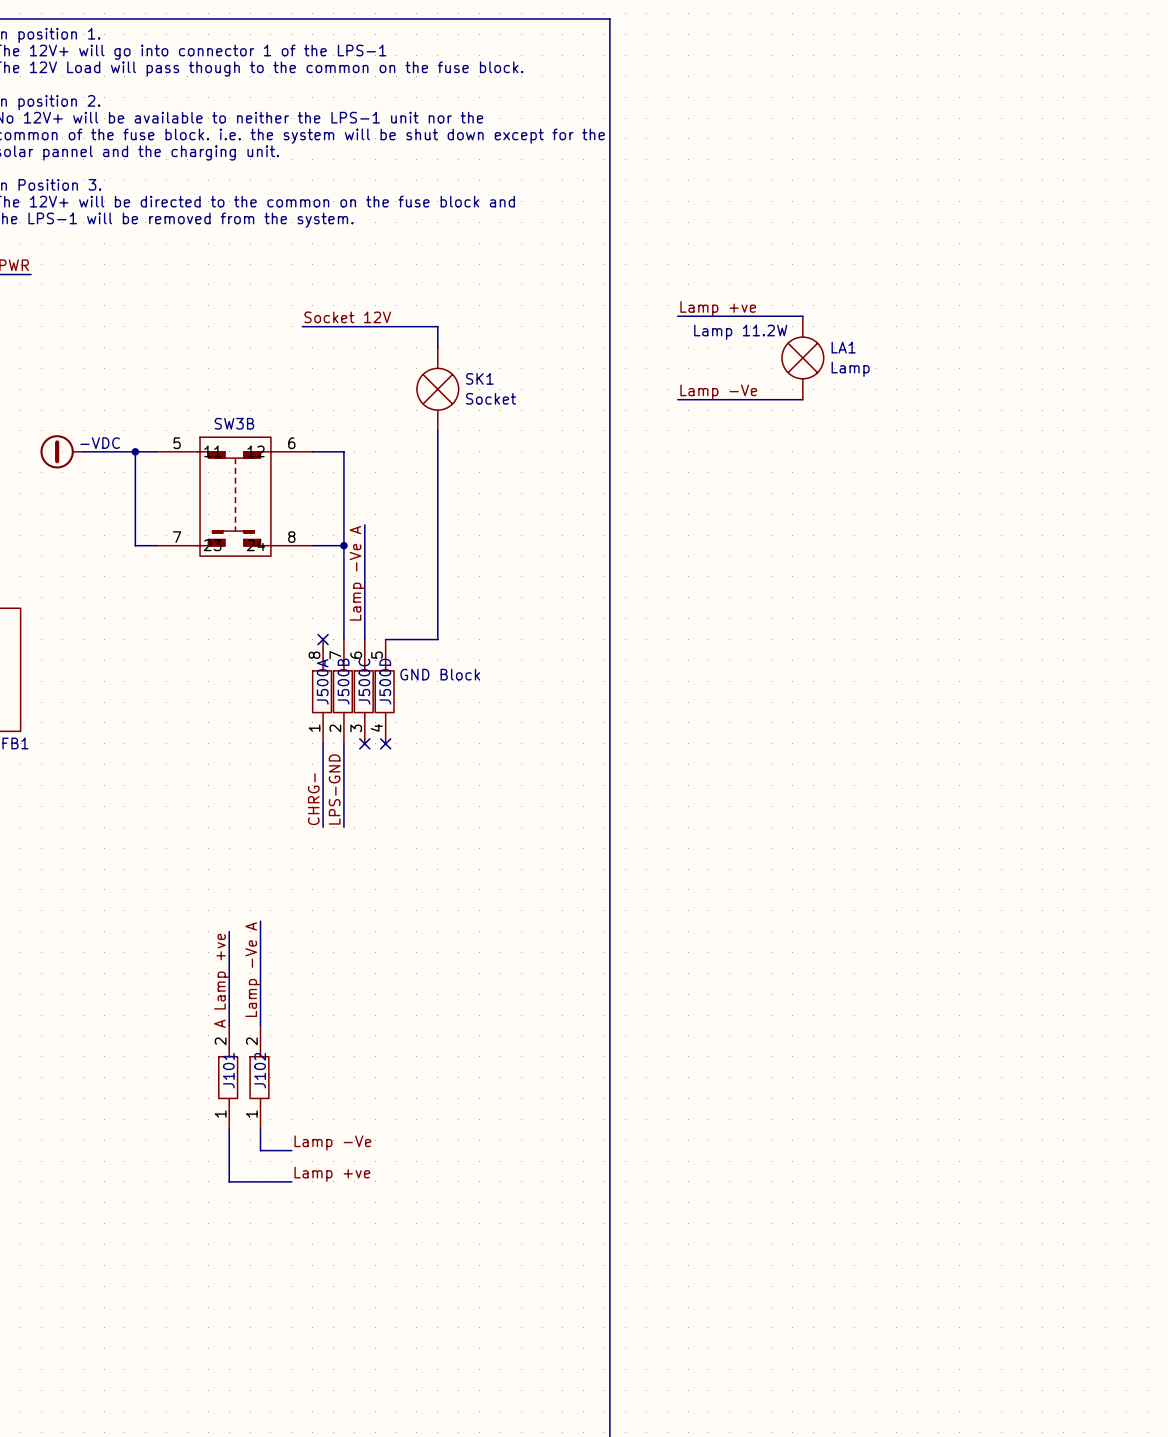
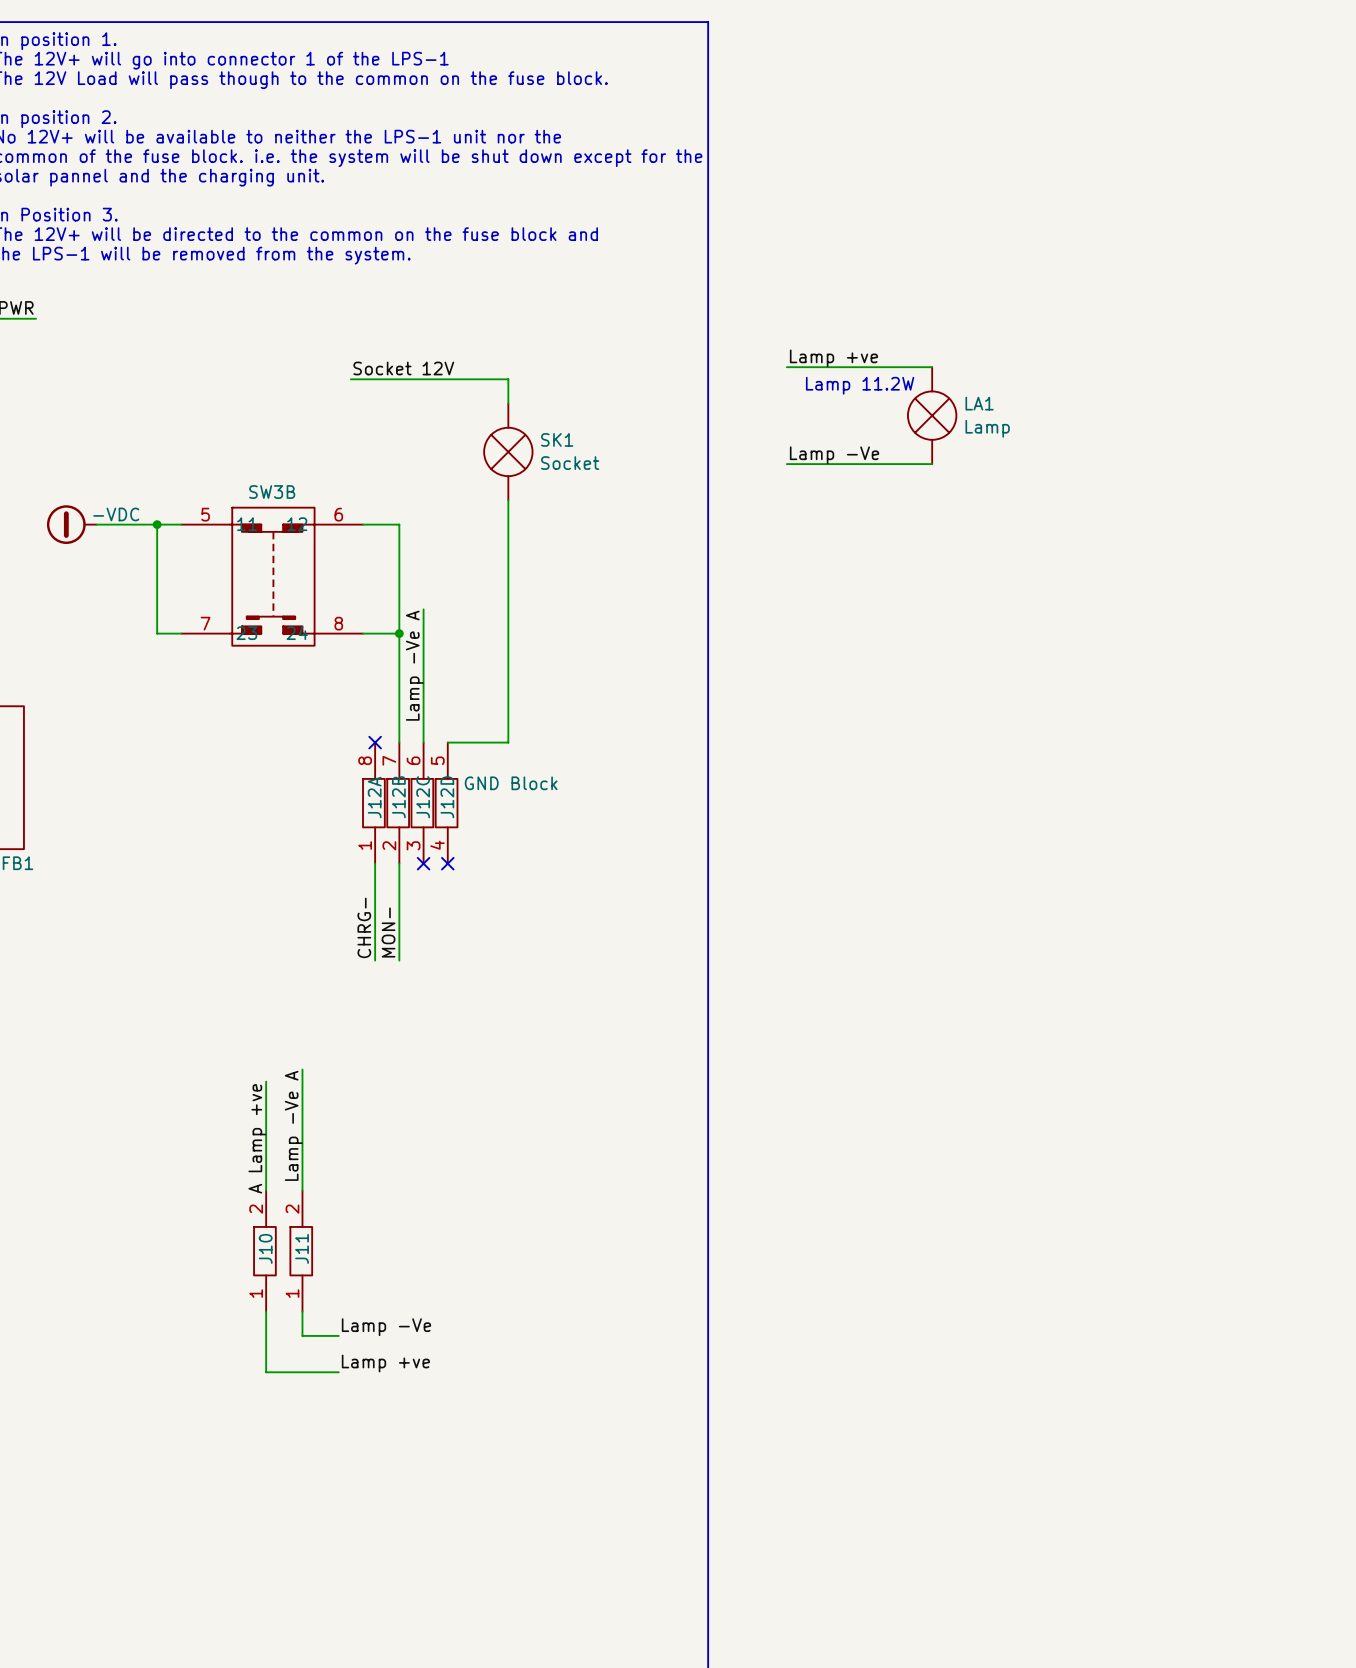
J500A name: J500A (322, 681) -> J12A (374, 797)
J500B name: J500B (343, 681) -> J12B (398, 797)
J500C name: J500C (364, 681) -> J12C (423, 797)
J500D name: J500D (385, 681) -> J12D (447, 797)
label: LPS-GND (334, 789) -> MON- (388, 932)
J101 name: J101 (228, 1070) -> J10 (265, 1248)
J102 name: J102 (260, 1070) -> J11 (302, 1248)

